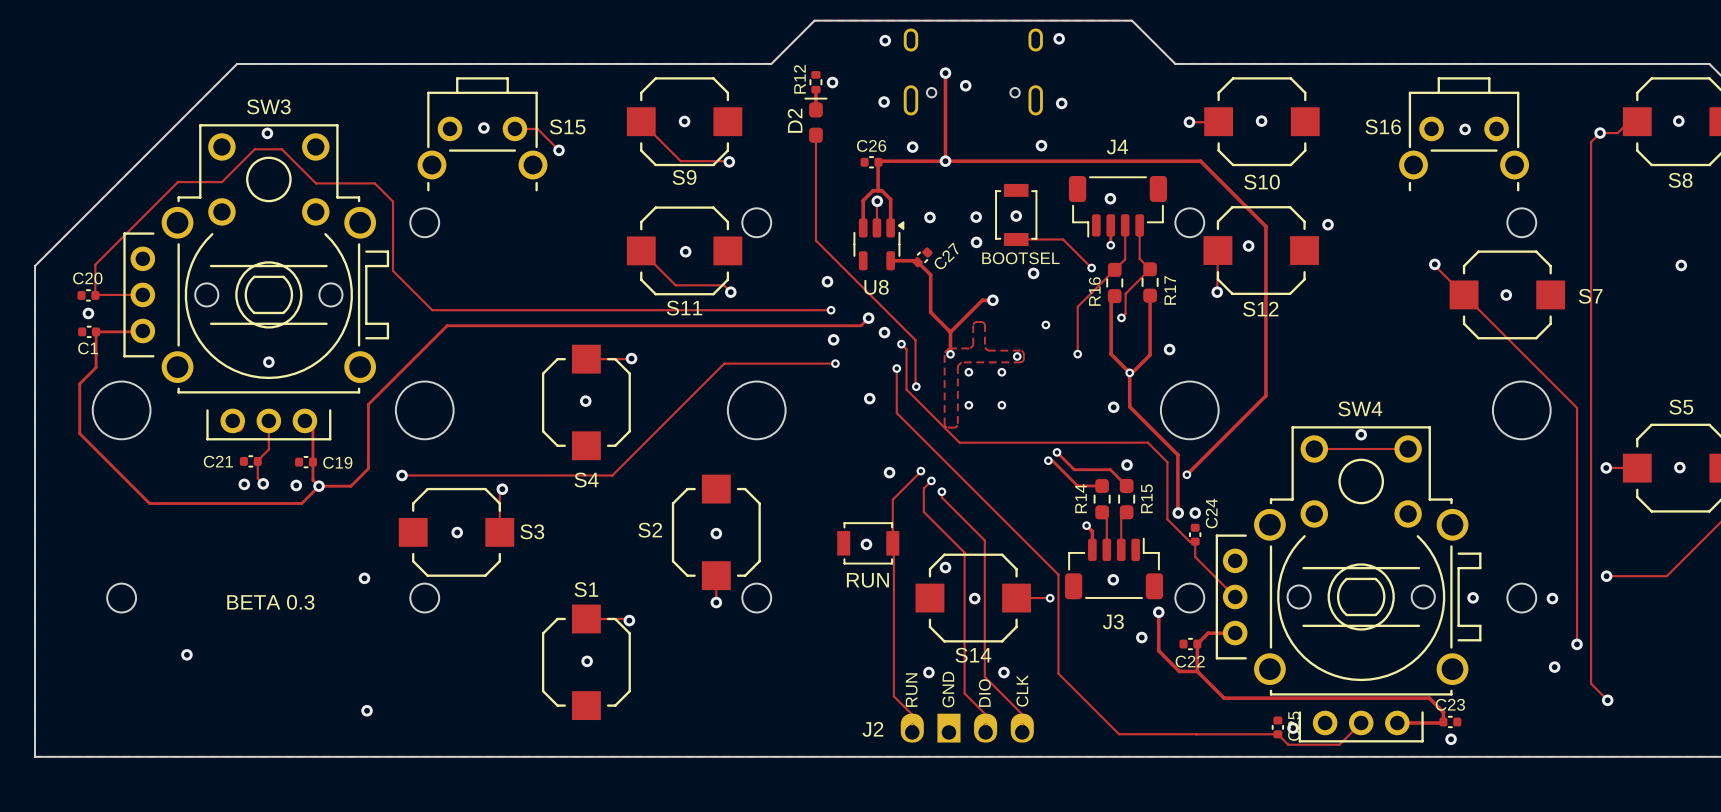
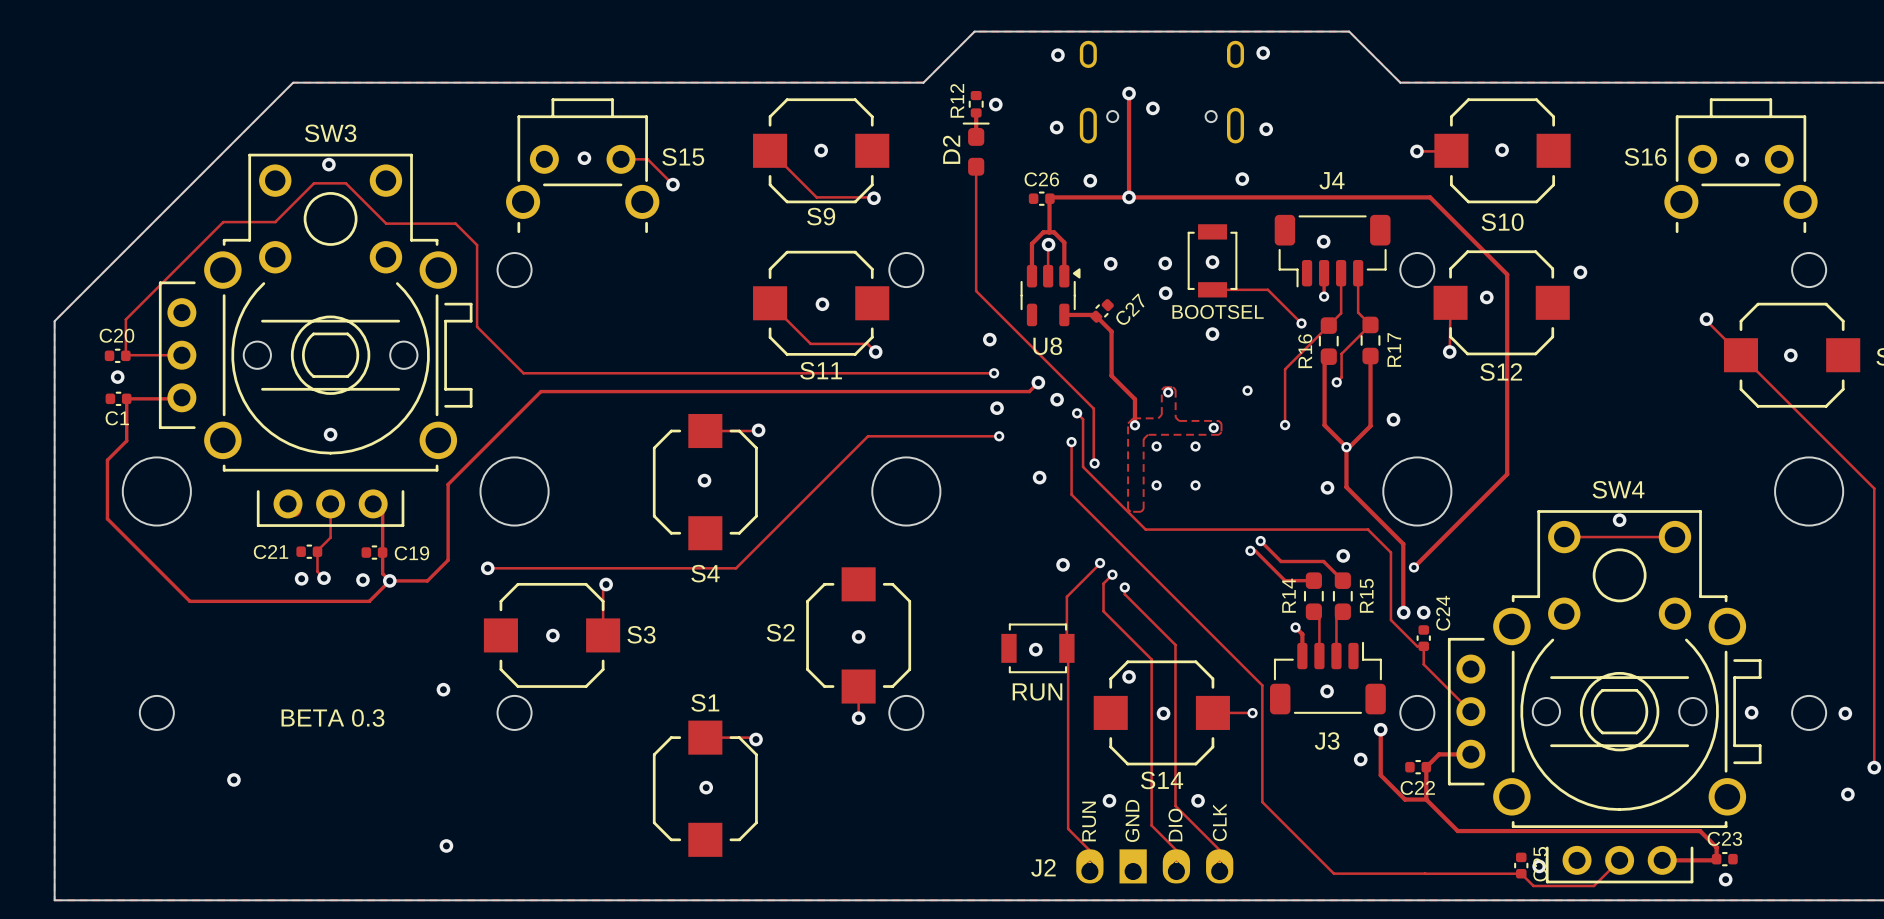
via: (1033, 273) -> none
via: none -> (1212, 334)
track: (992, 300) (982, 300) (950, 332) -> none
via: (992, 300) -> none
via: none -> (1168, 392)

